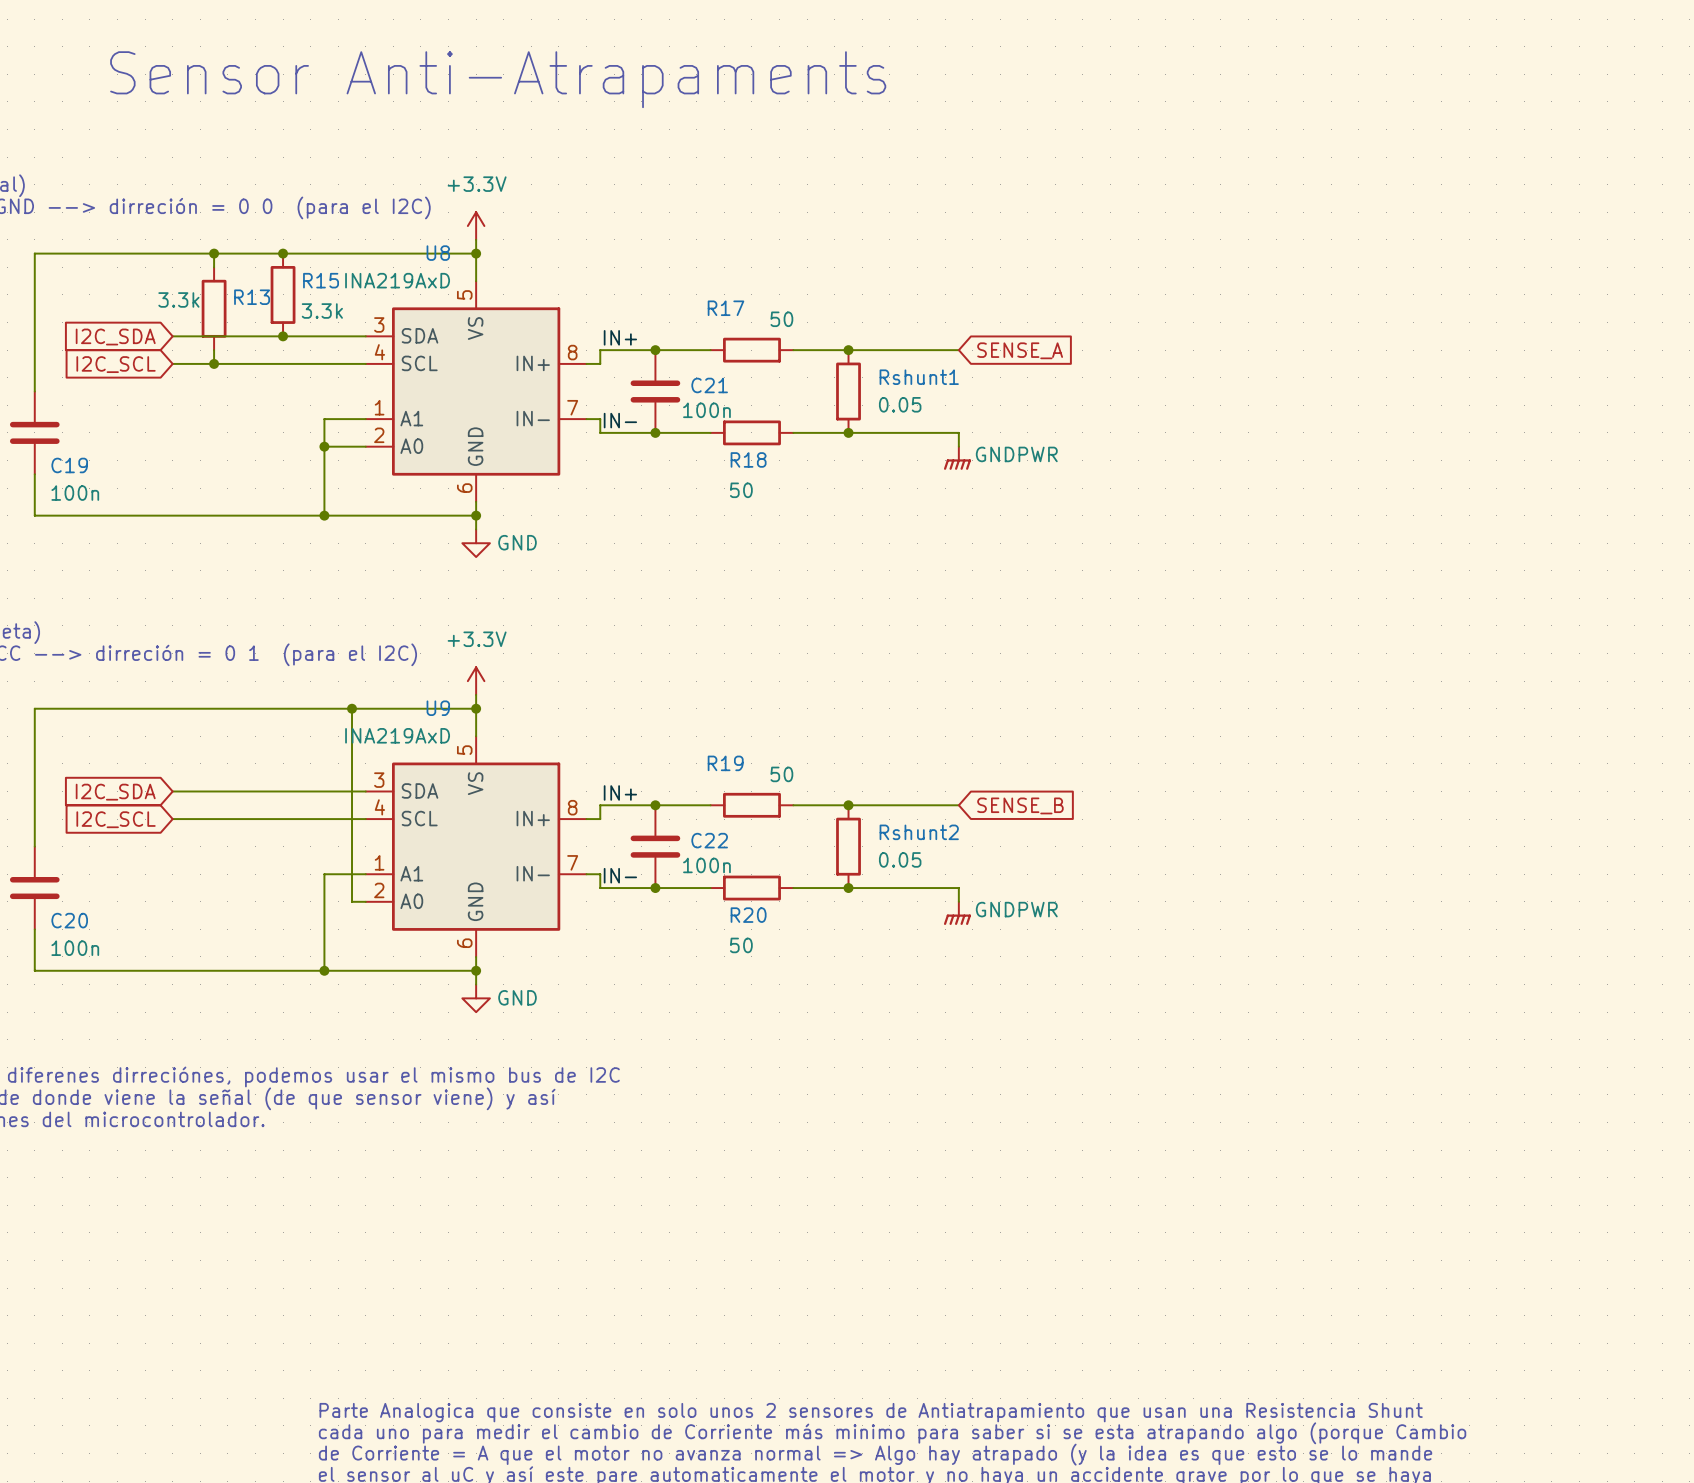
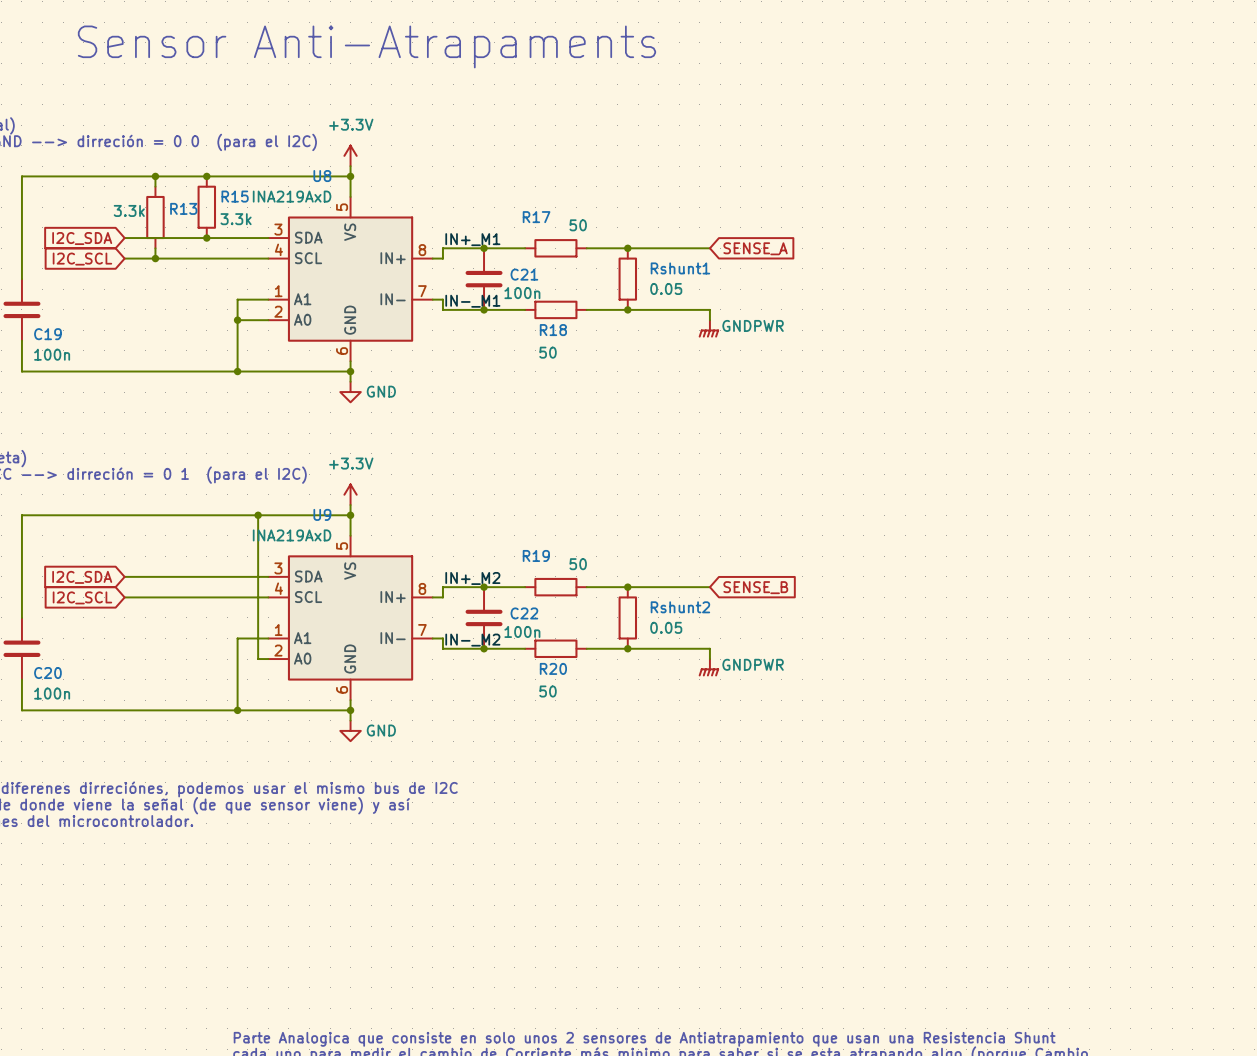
label: IN+ (620, 337) -> IN+_M1 (472, 239)
label: IN- (620, 420) -> IN-_M1 (472, 301)
label: IN+ (620, 792) -> IN+_M2 (472, 578)
label: IN- (620, 875) -> IN-_M2 (472, 640)

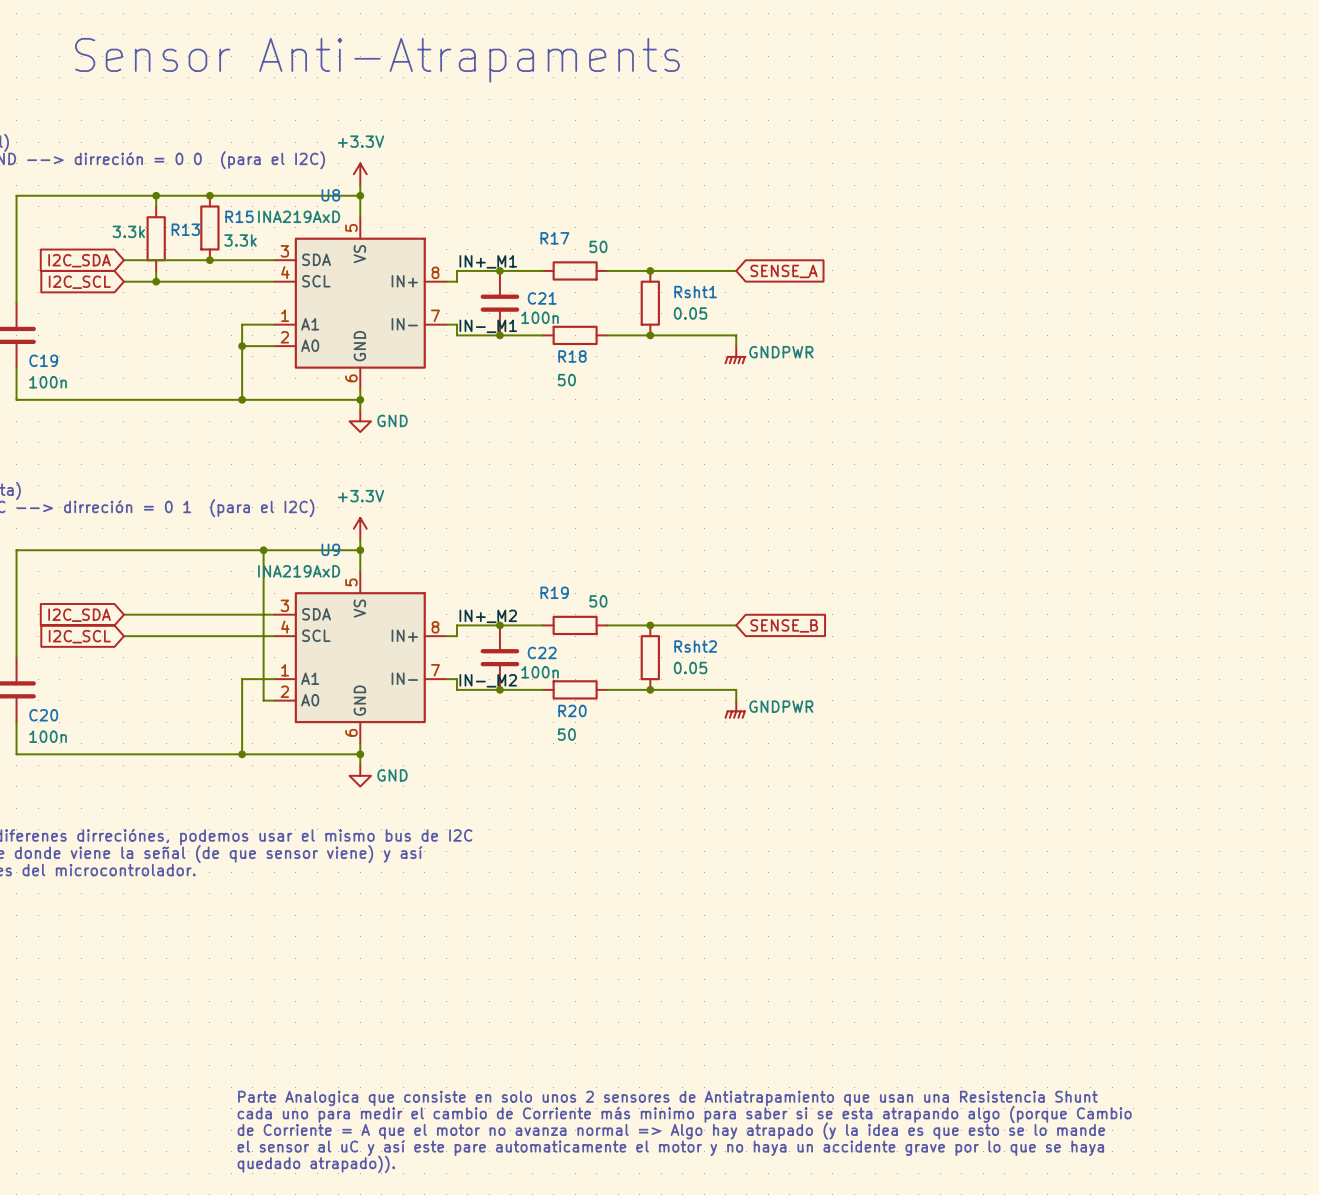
Rshunt1 name: Rshunt1 (680, 268) -> Rsht1 (695, 292)
Rshunt2 name: Rshunt2 (680, 607) -> Rsht2 (695, 646)

